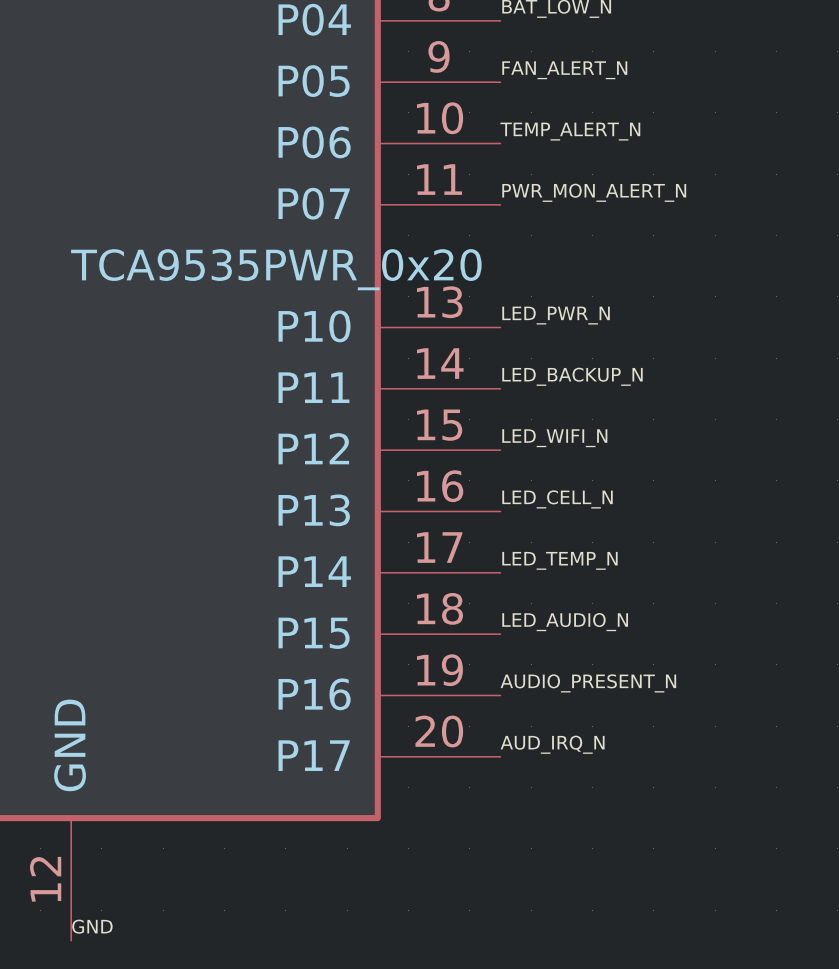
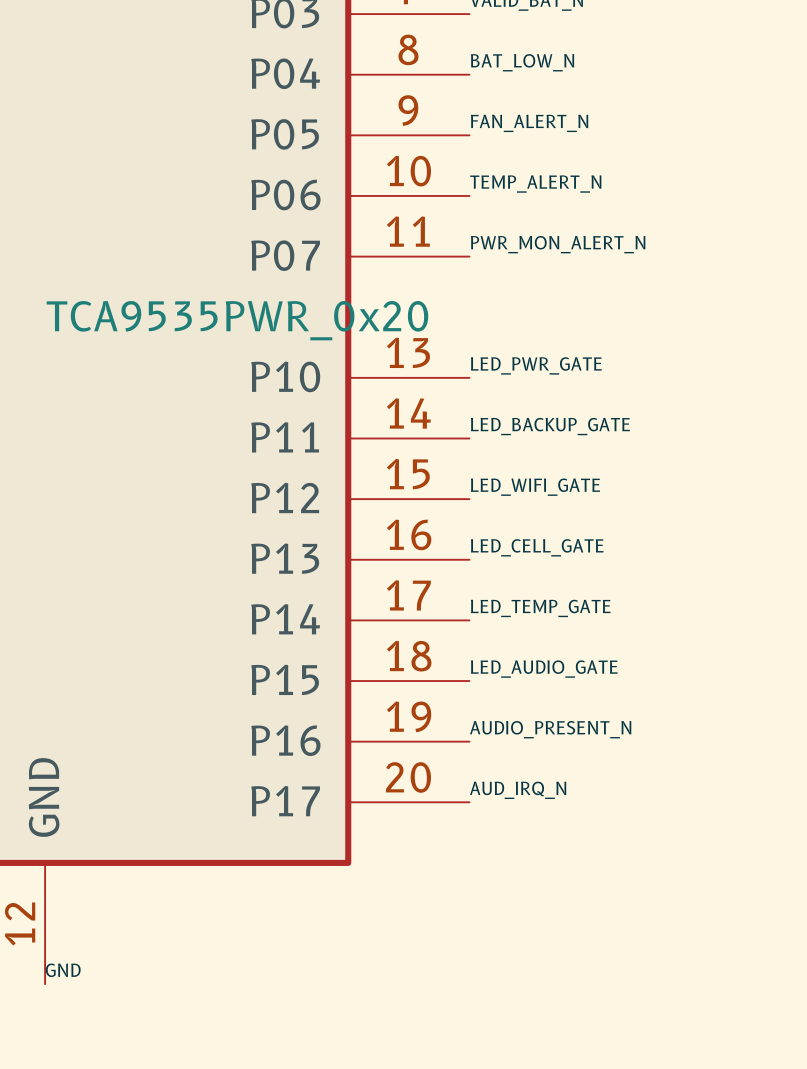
label: LED_PWR_N (556, 315) -> LED_PWR_GATE (536, 365)
label: LED_BACKUP_N (572, 376) -> LED_BACKUP_GATE (550, 426)
label: LED_WIFI_N (554, 438) -> LED_WIFI_GATE (535, 487)
label: LED_CELL_N (557, 499) -> LED_CELL_GATE (537, 547)
label: LED_TEMP_N (559, 560) -> LED_TEMP_GATE (540, 608)
label: LED_AUDIO_N (565, 622) -> LED_AUDIO_GATE (544, 669)

